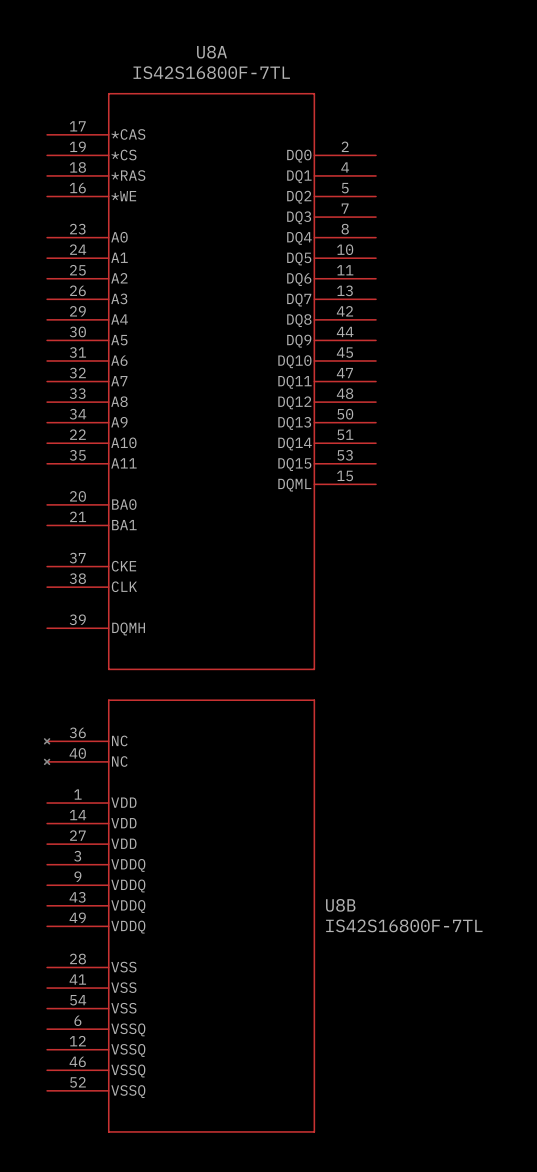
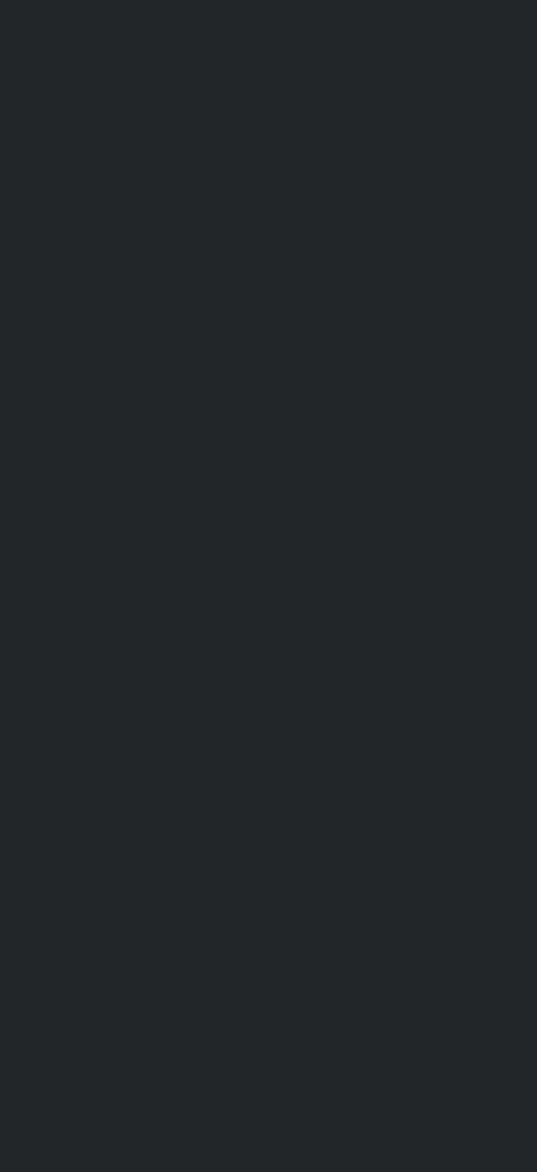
U8A: IS42S16800F-7TL (211, 381) -> none
U8B: IS42S16800F-7TL (179, 916) -> none

